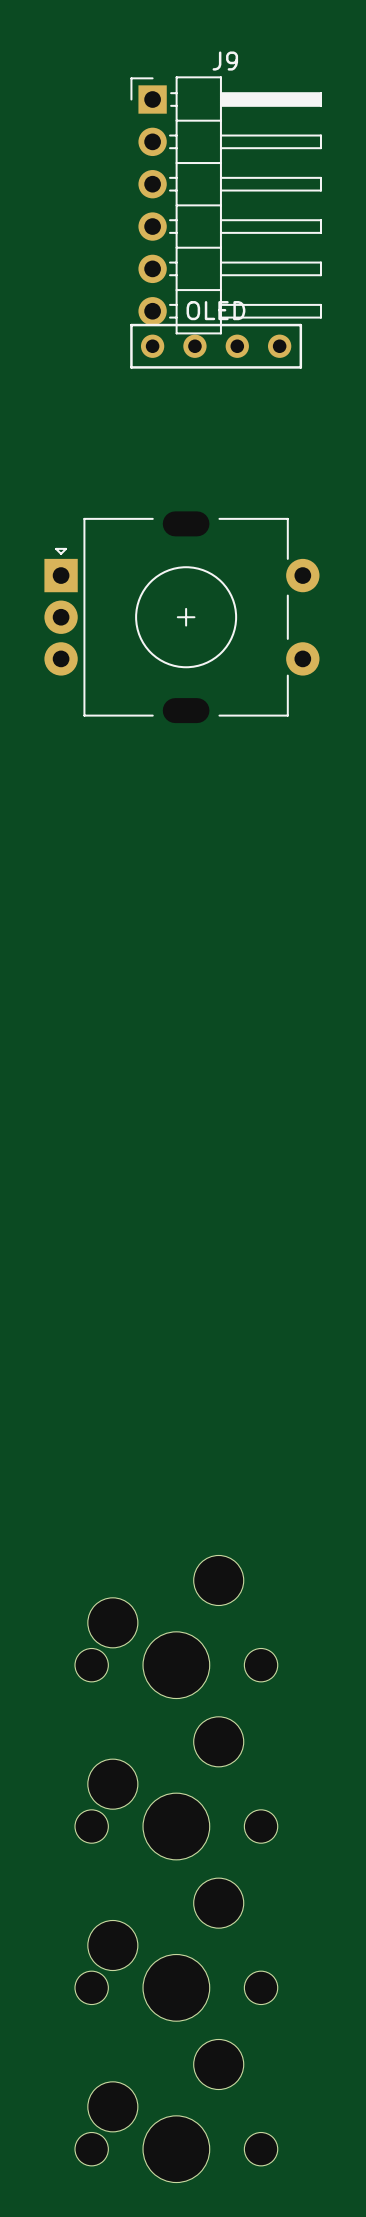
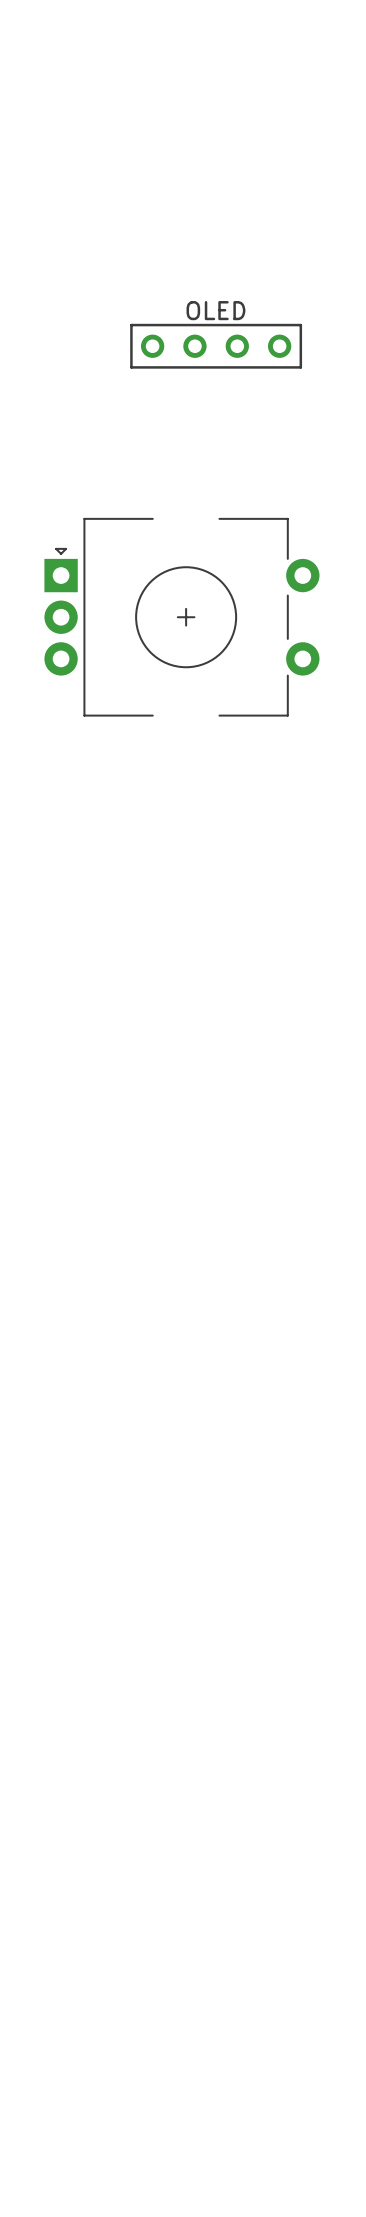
J9: (226, 205) -> none
part: (176, 1627) -> none
part: (176, 1788) -> none
part: (176, 1949) -> none
part: (176, 2111) -> none

